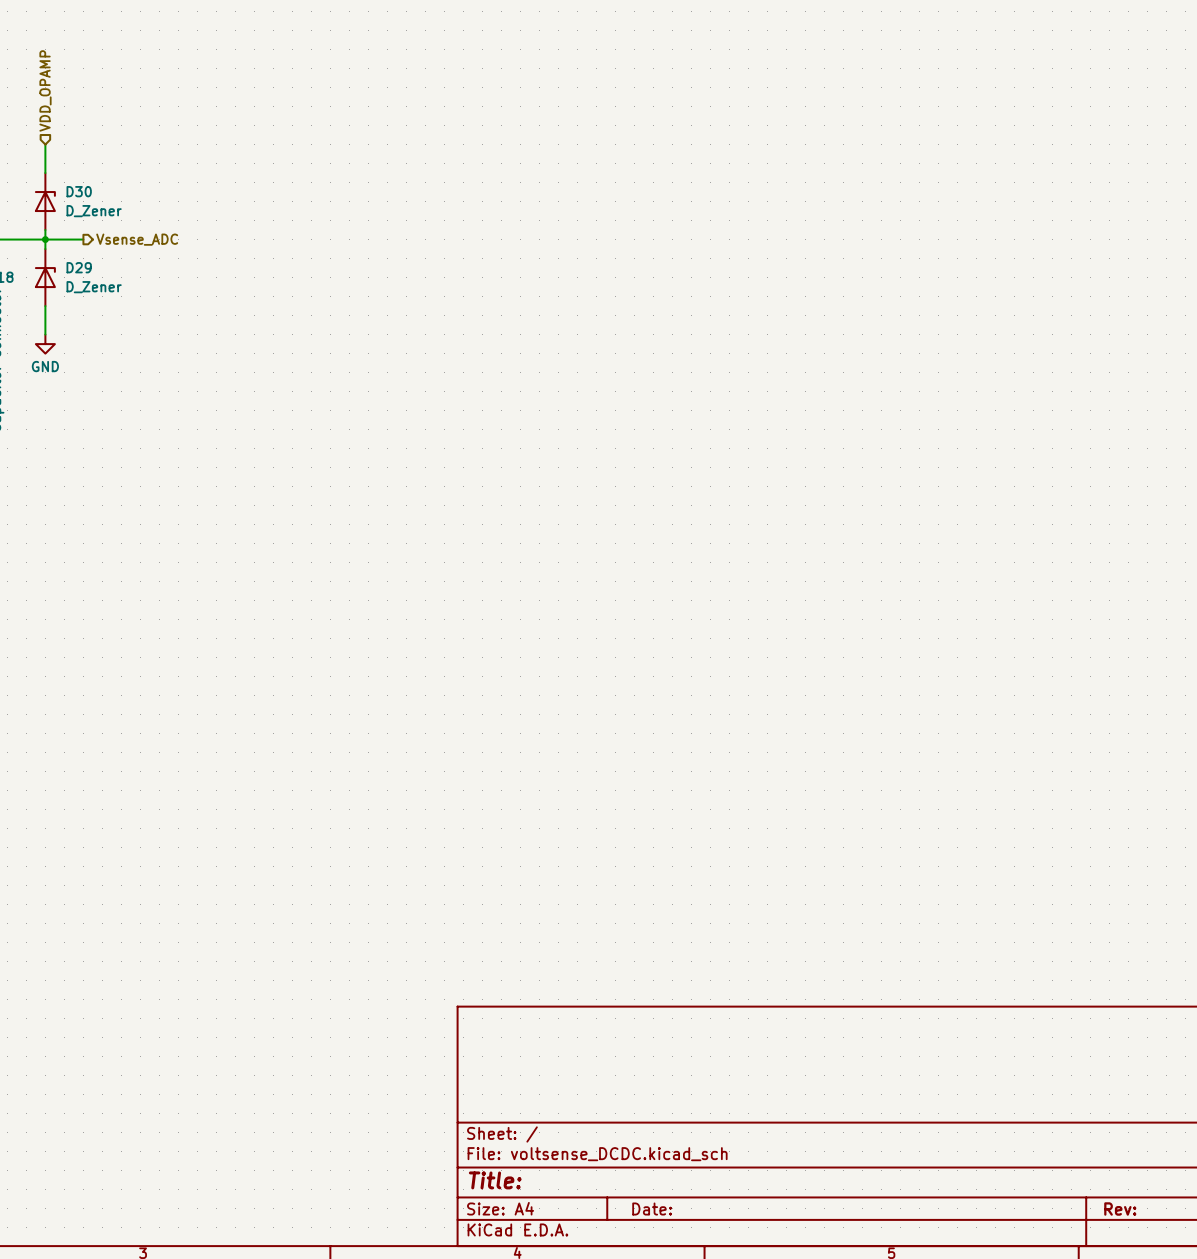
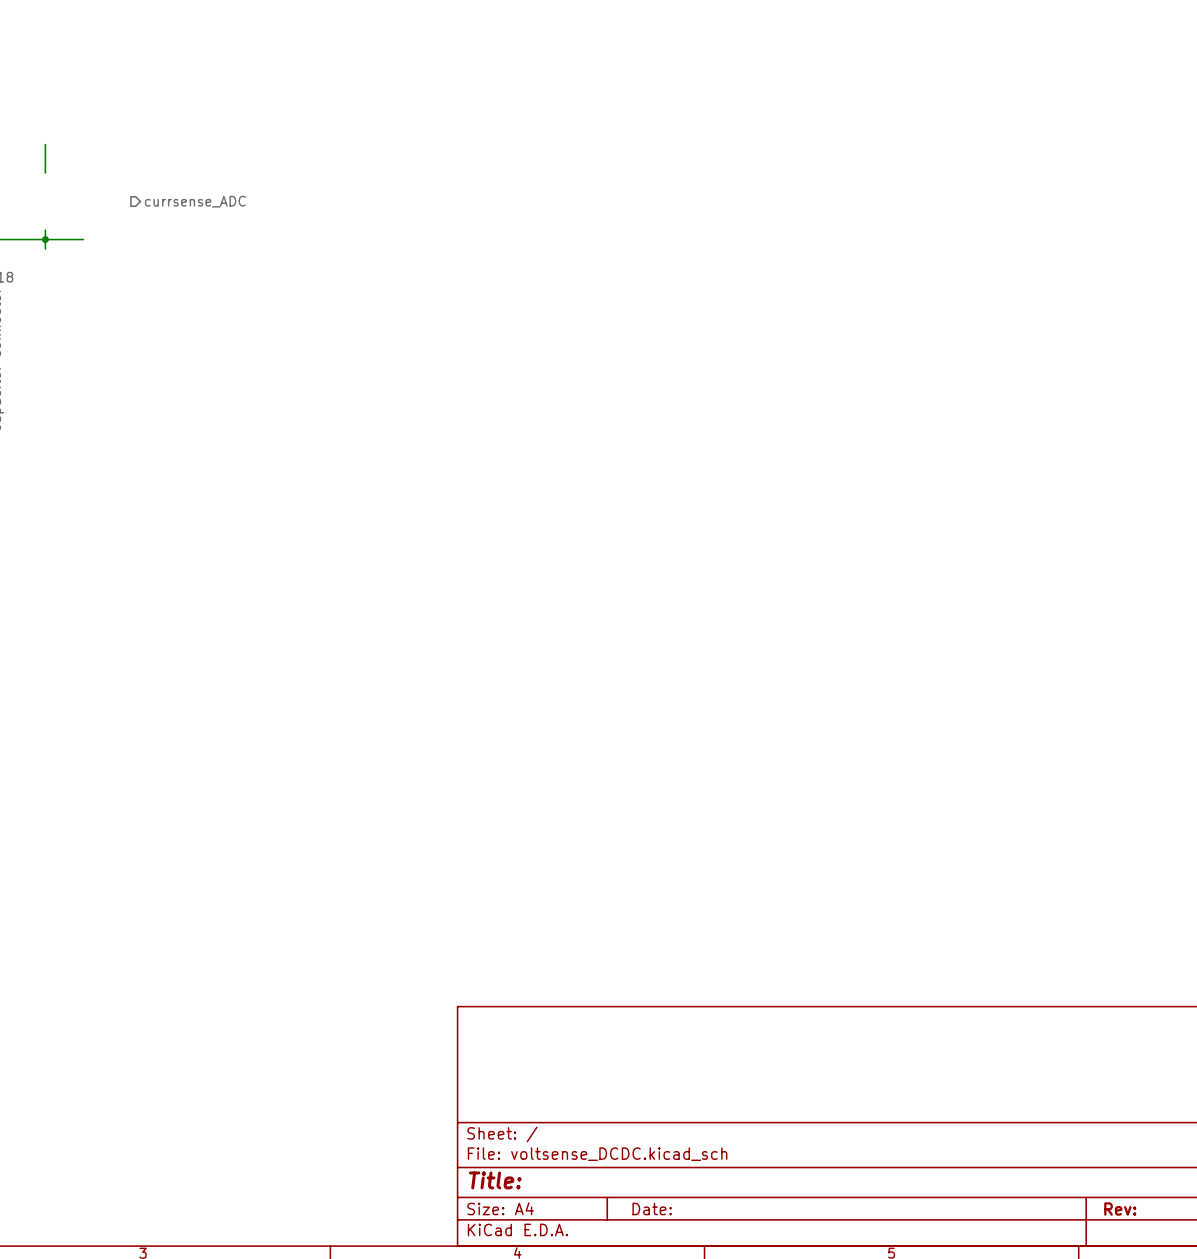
hierarchical label: VDD_OPAMP (45, 90) -> none
D30: D_Zener (45, 201) -> none
hierarchical label: none -> currsense_ADC (195, 201)
hierarchical label: Vsense_ADC (137, 239) -> none
D29: D_Zener (45, 277) -> none
wire: (45, 306) (45, 334) -> none
power symbol: GND (45, 344) -> none

